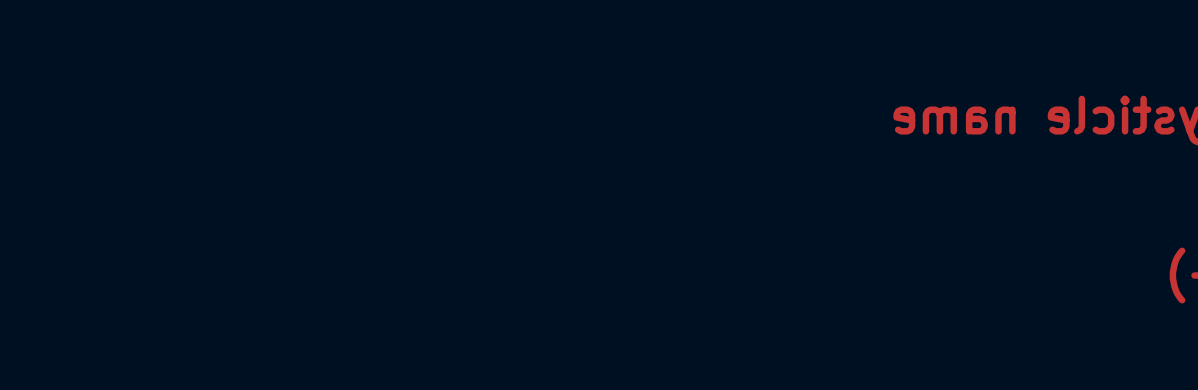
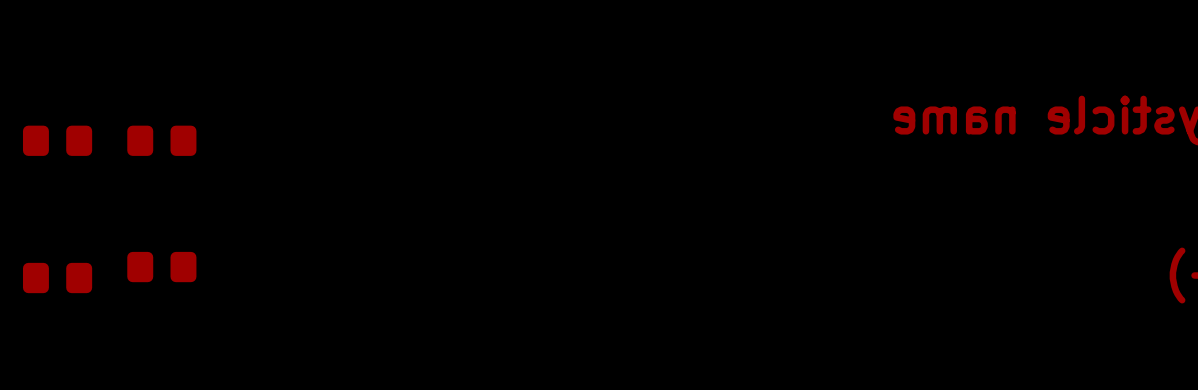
part: none -> (57, 140)
part: none -> (161, 140)
part: none -> (161, 267)
part: none -> (57, 278)

